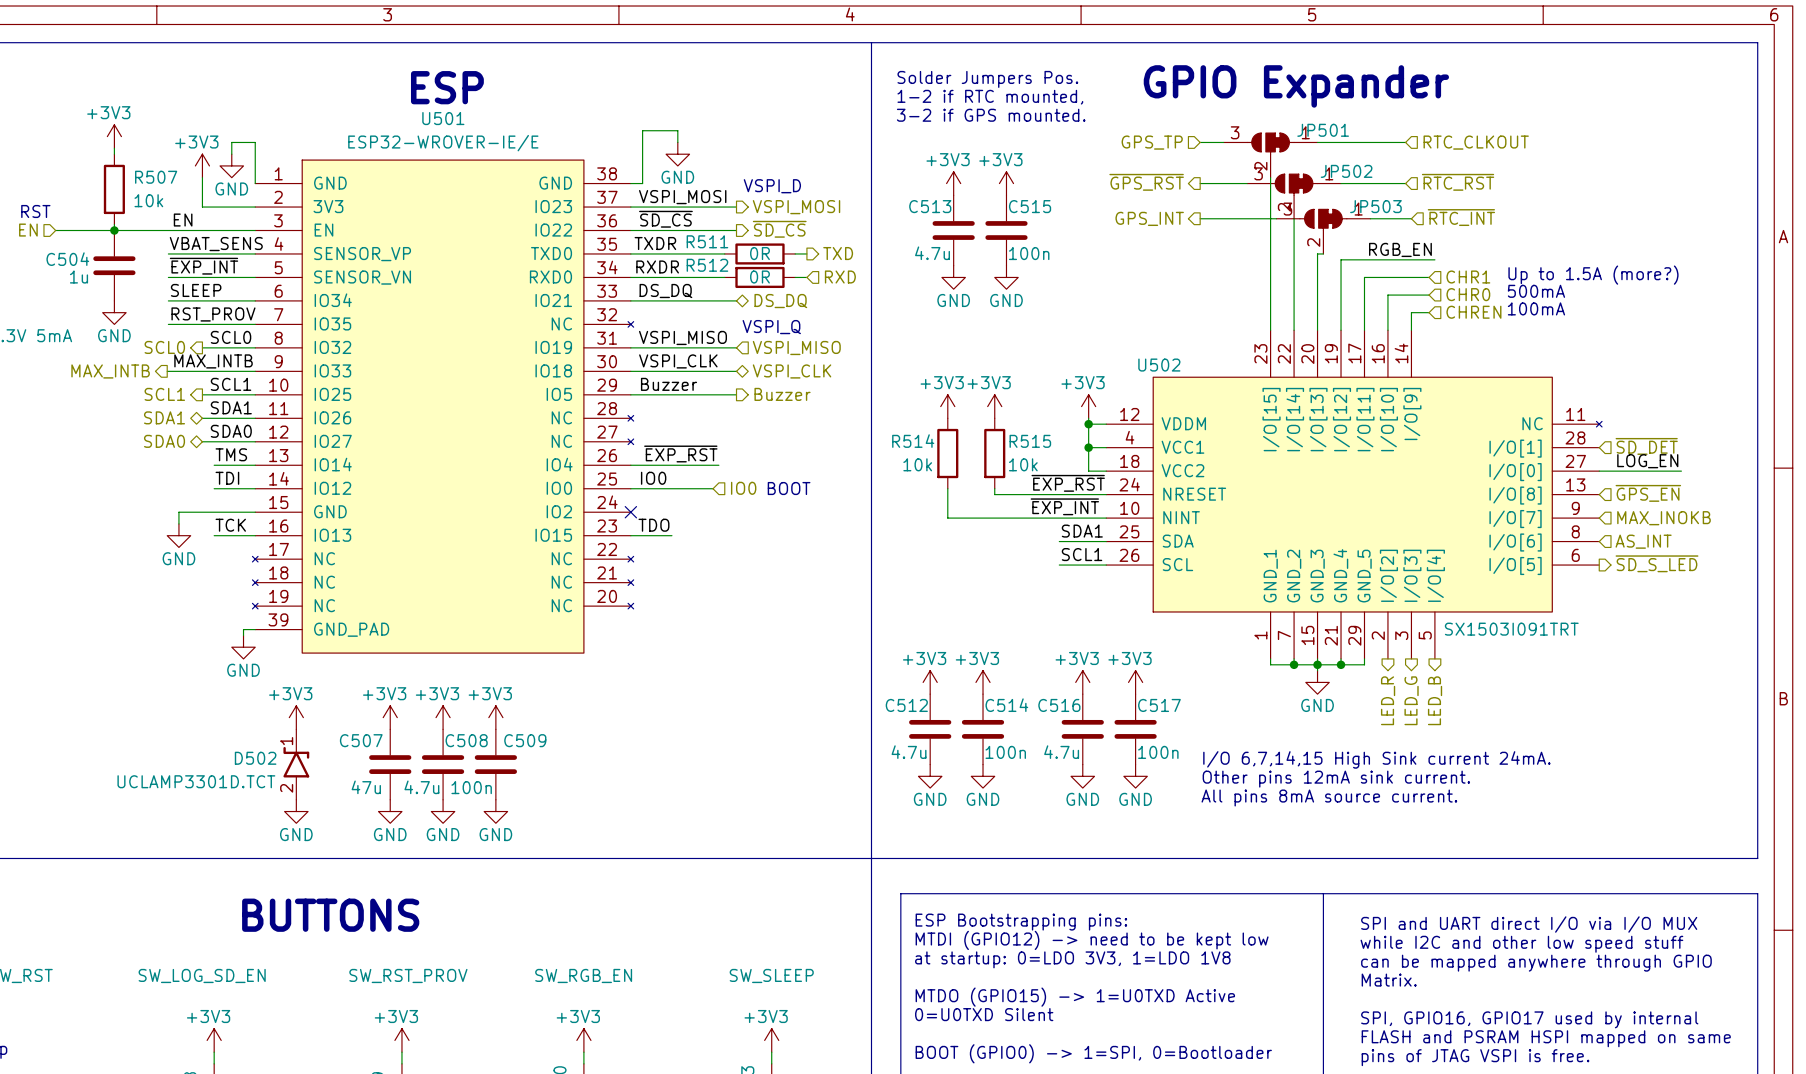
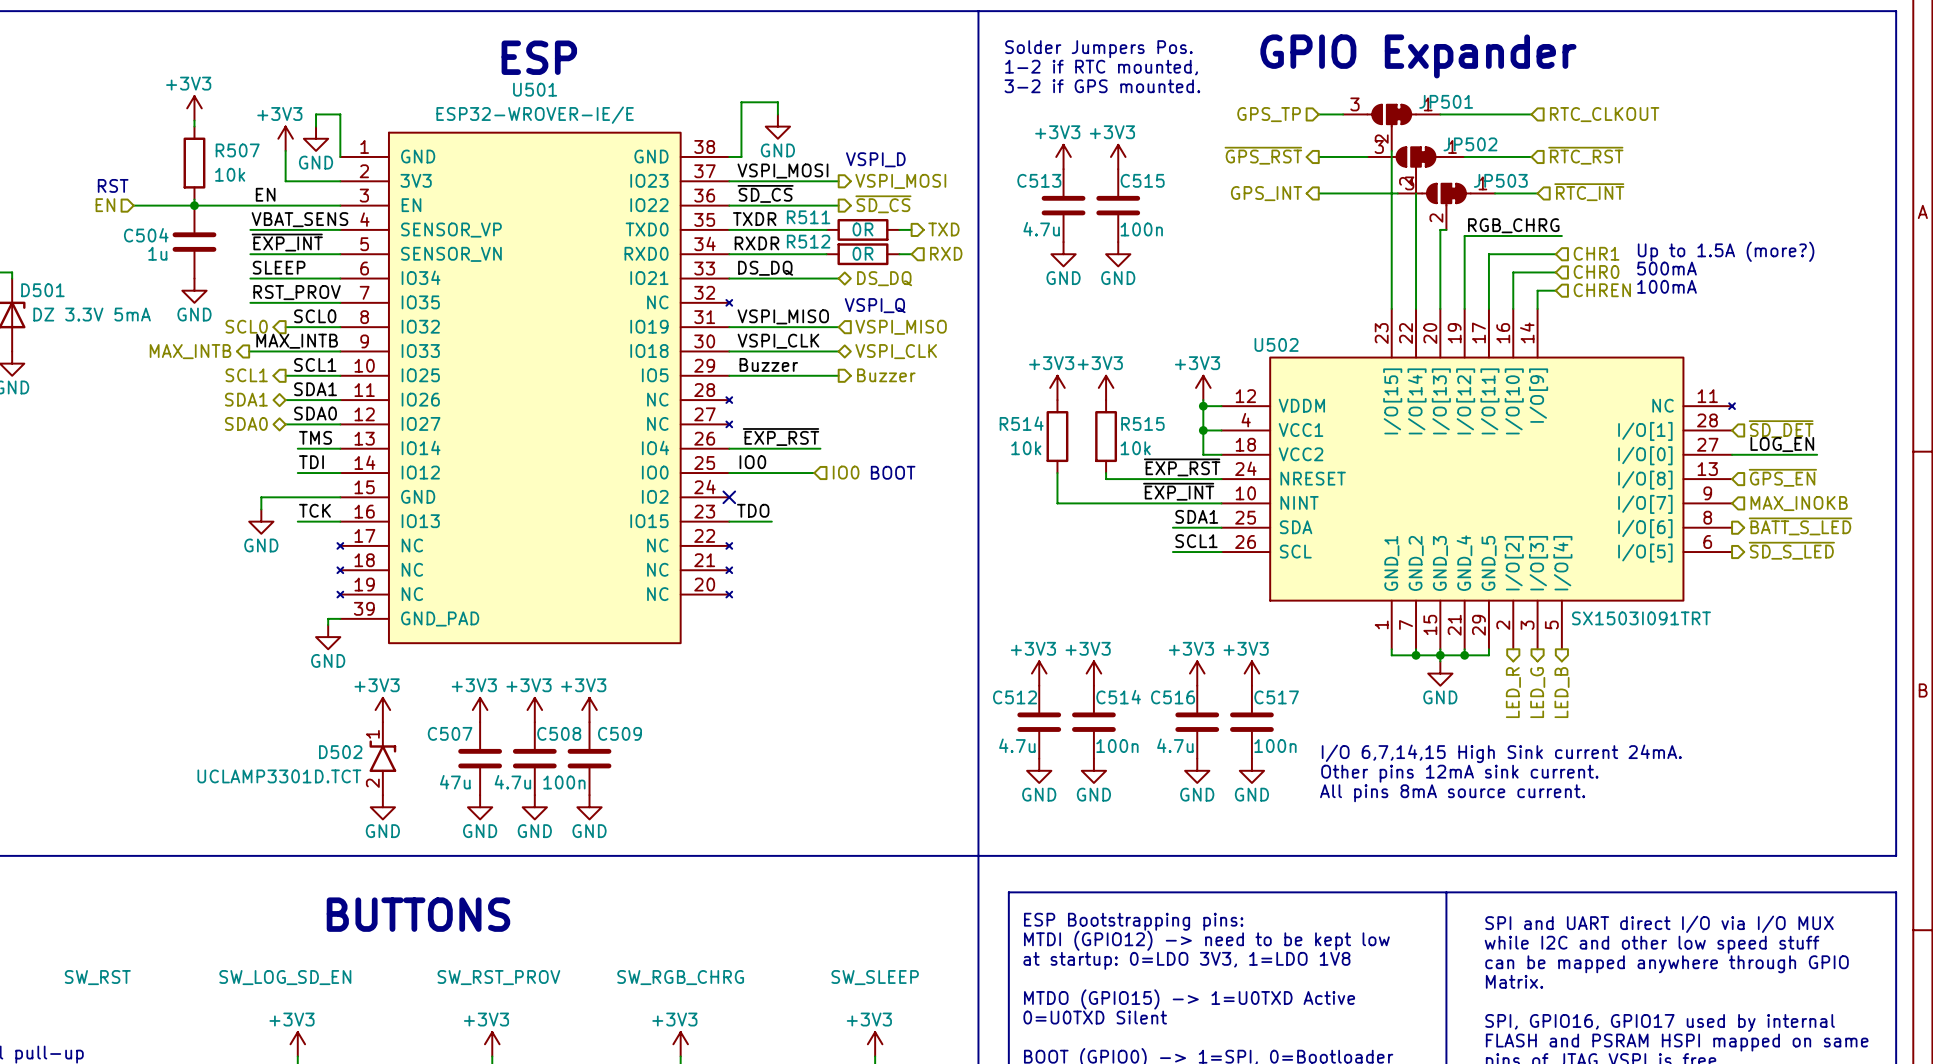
label: RGB_EN (1400, 249) -> RGB_CHRG (1513, 225)
hierarchical label shape: input (1643, 541) -> output (1800, 526)
hierarchical label: AS_INT (1643, 541) -> ~{BATT_S_LED} (1800, 526)
part value: SW_RGB_EN (583, 975) -> SW_RGB_CHRG (680, 977)

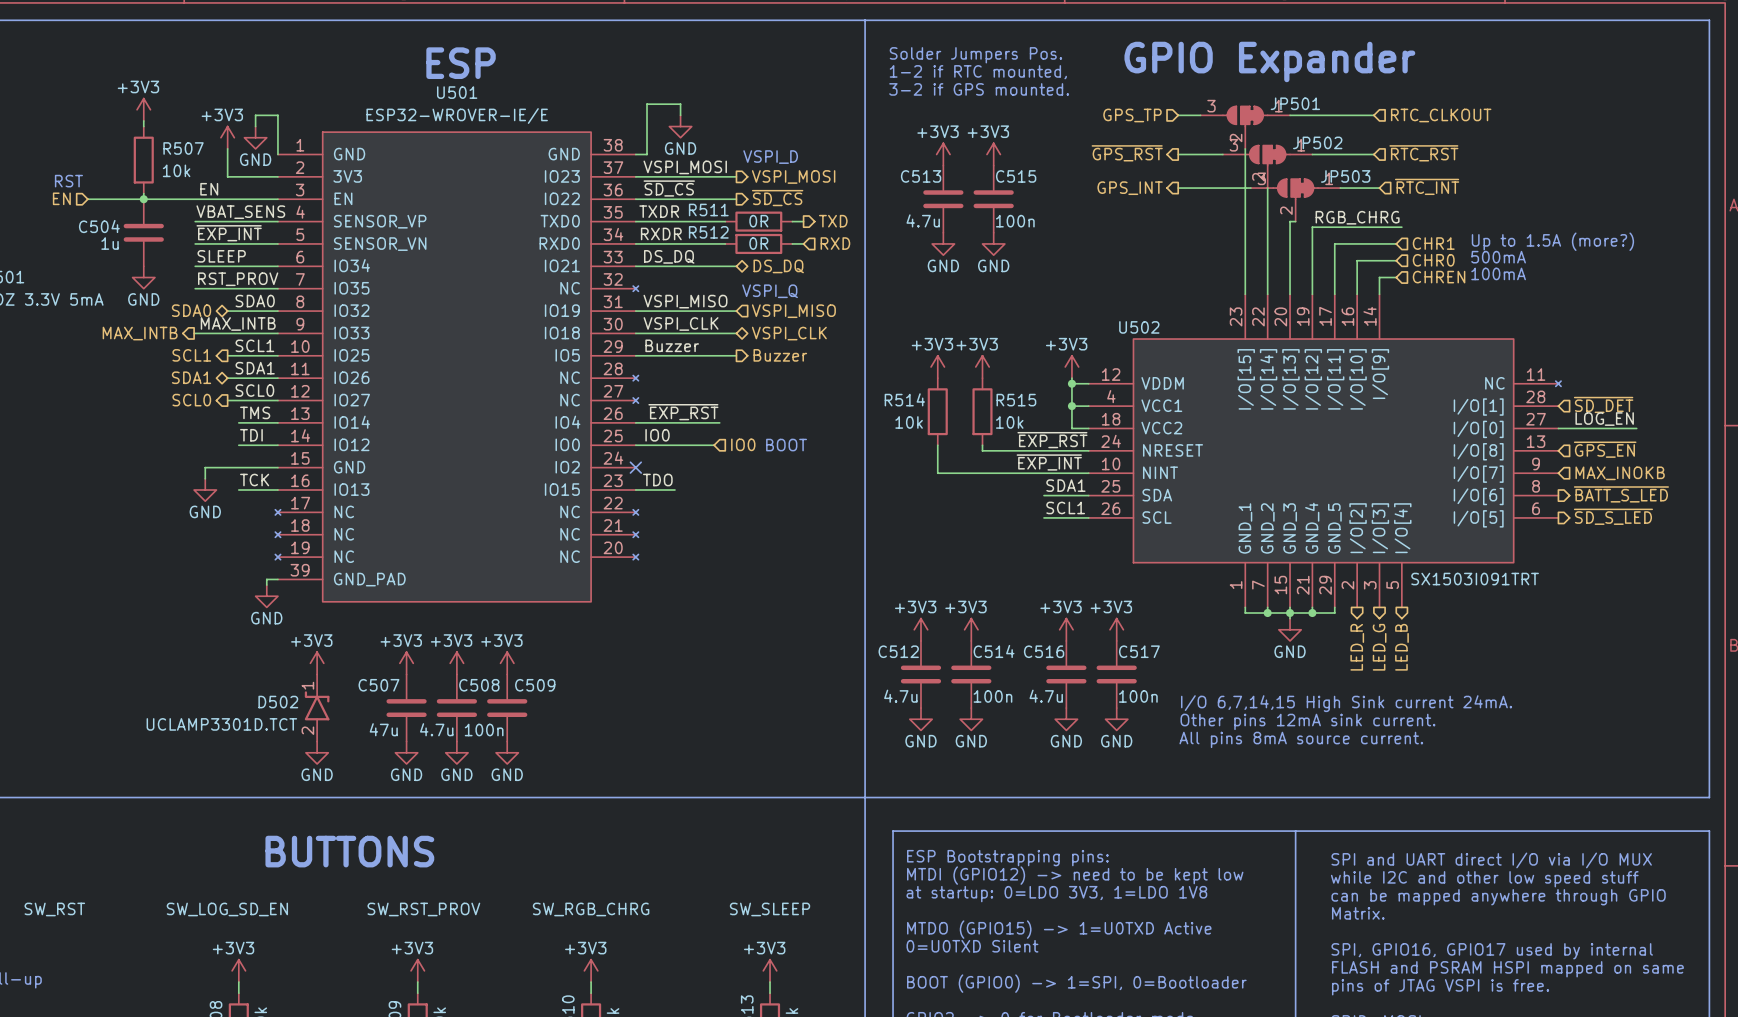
label: SCL0 (315, 316) -> SDA0 (255, 301)
hierarchical label shape: output (246, 326) -> bidirectional (191, 310)
hierarchical label: SCL0 (246, 326) -> SDA0 (191, 310)
label: SDA0 (315, 413) -> SCL0 (254, 390)
hierarchical label shape: bidirectional (246, 423) -> output (191, 400)
hierarchical label: SDA0 (246, 423) -> SCL0 (191, 400)

